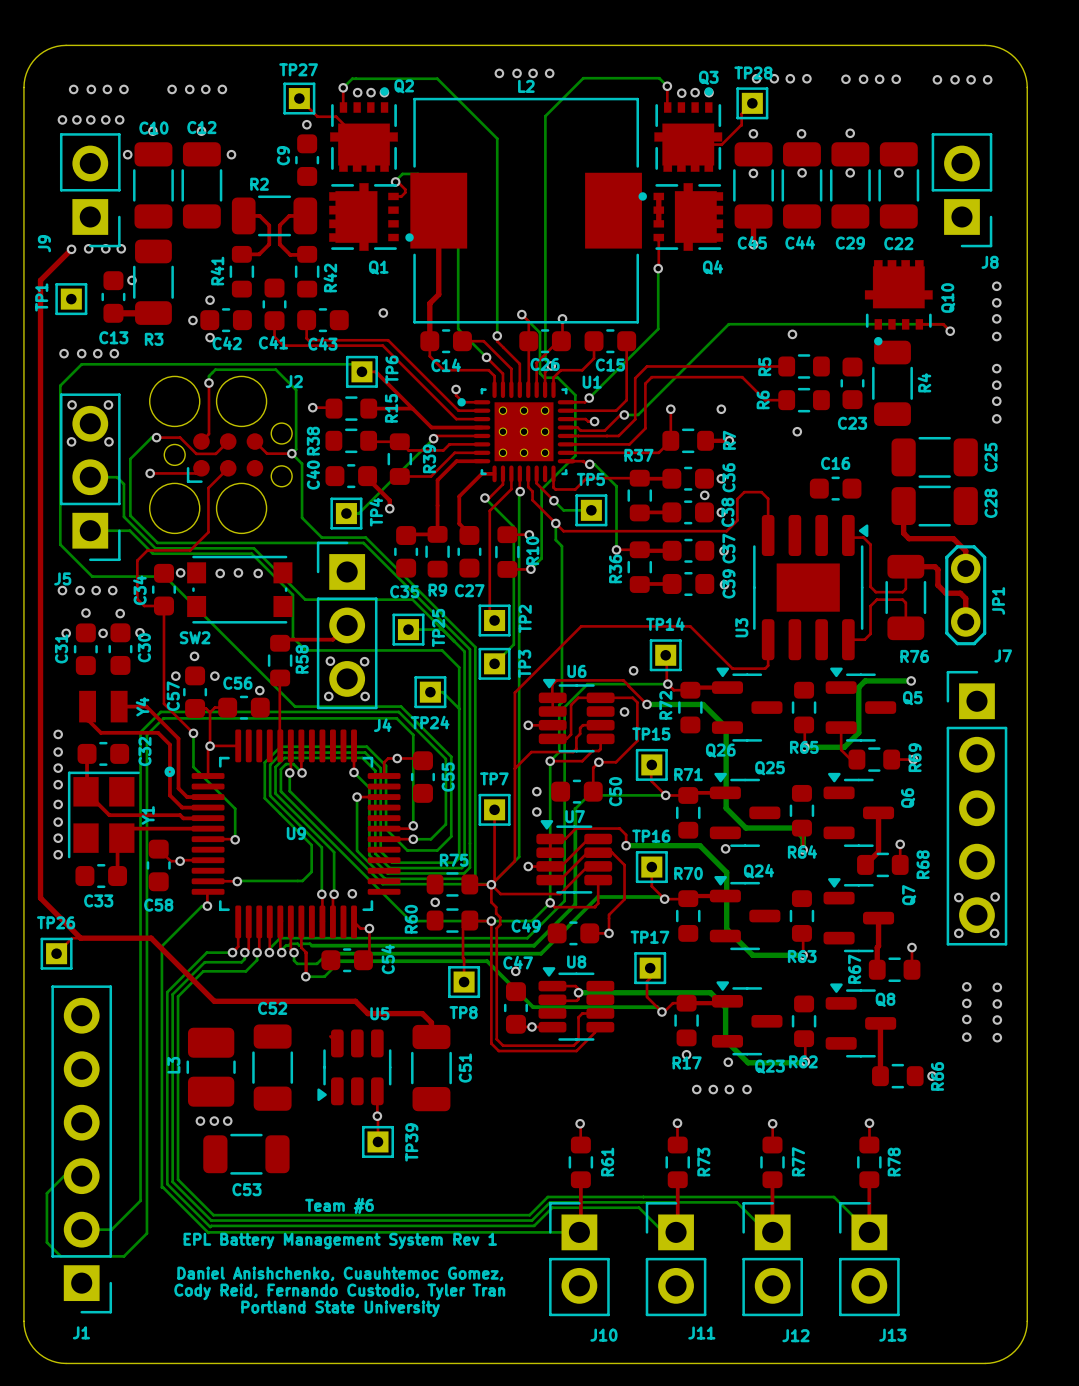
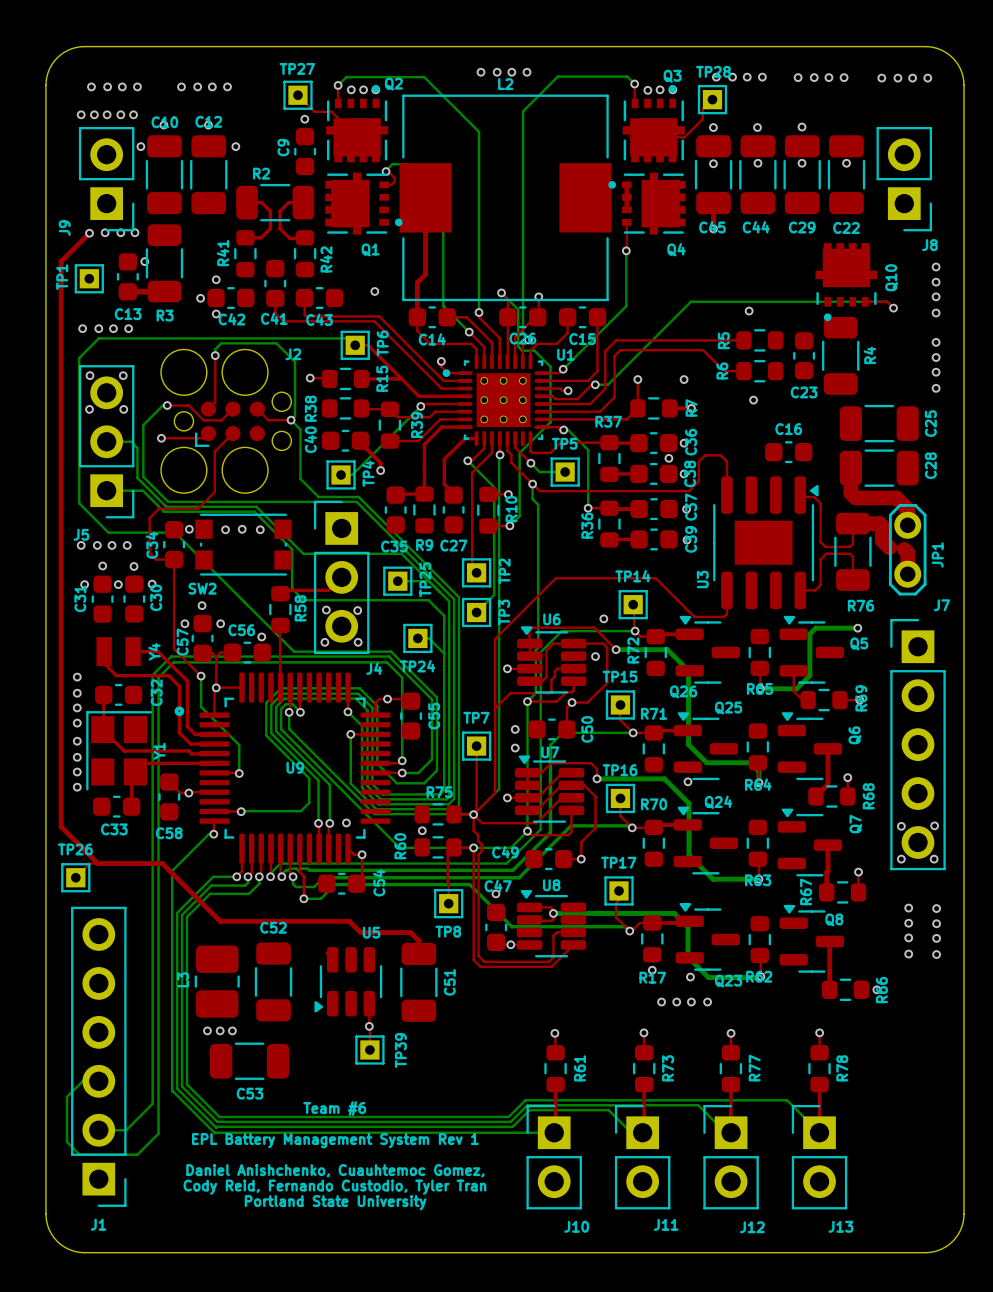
top track width: thin (903, 506) (903, 533) (909, 538) (953, 538) (965, 550) (965, 568) -> thick (850, 468) (850, 493) (855, 497) (896, 497) (907, 509) (907, 525)
top track width: thin (905, 566) (934, 566) (937, 569) (937, 585) (945, 593) -> thick (852, 523) (879, 523) (882, 526) (882, 540) (889, 547)
top track width: thin (962, 594) (965, 598) (965, 622) -> thick (904, 549) (907, 552) (907, 574)

